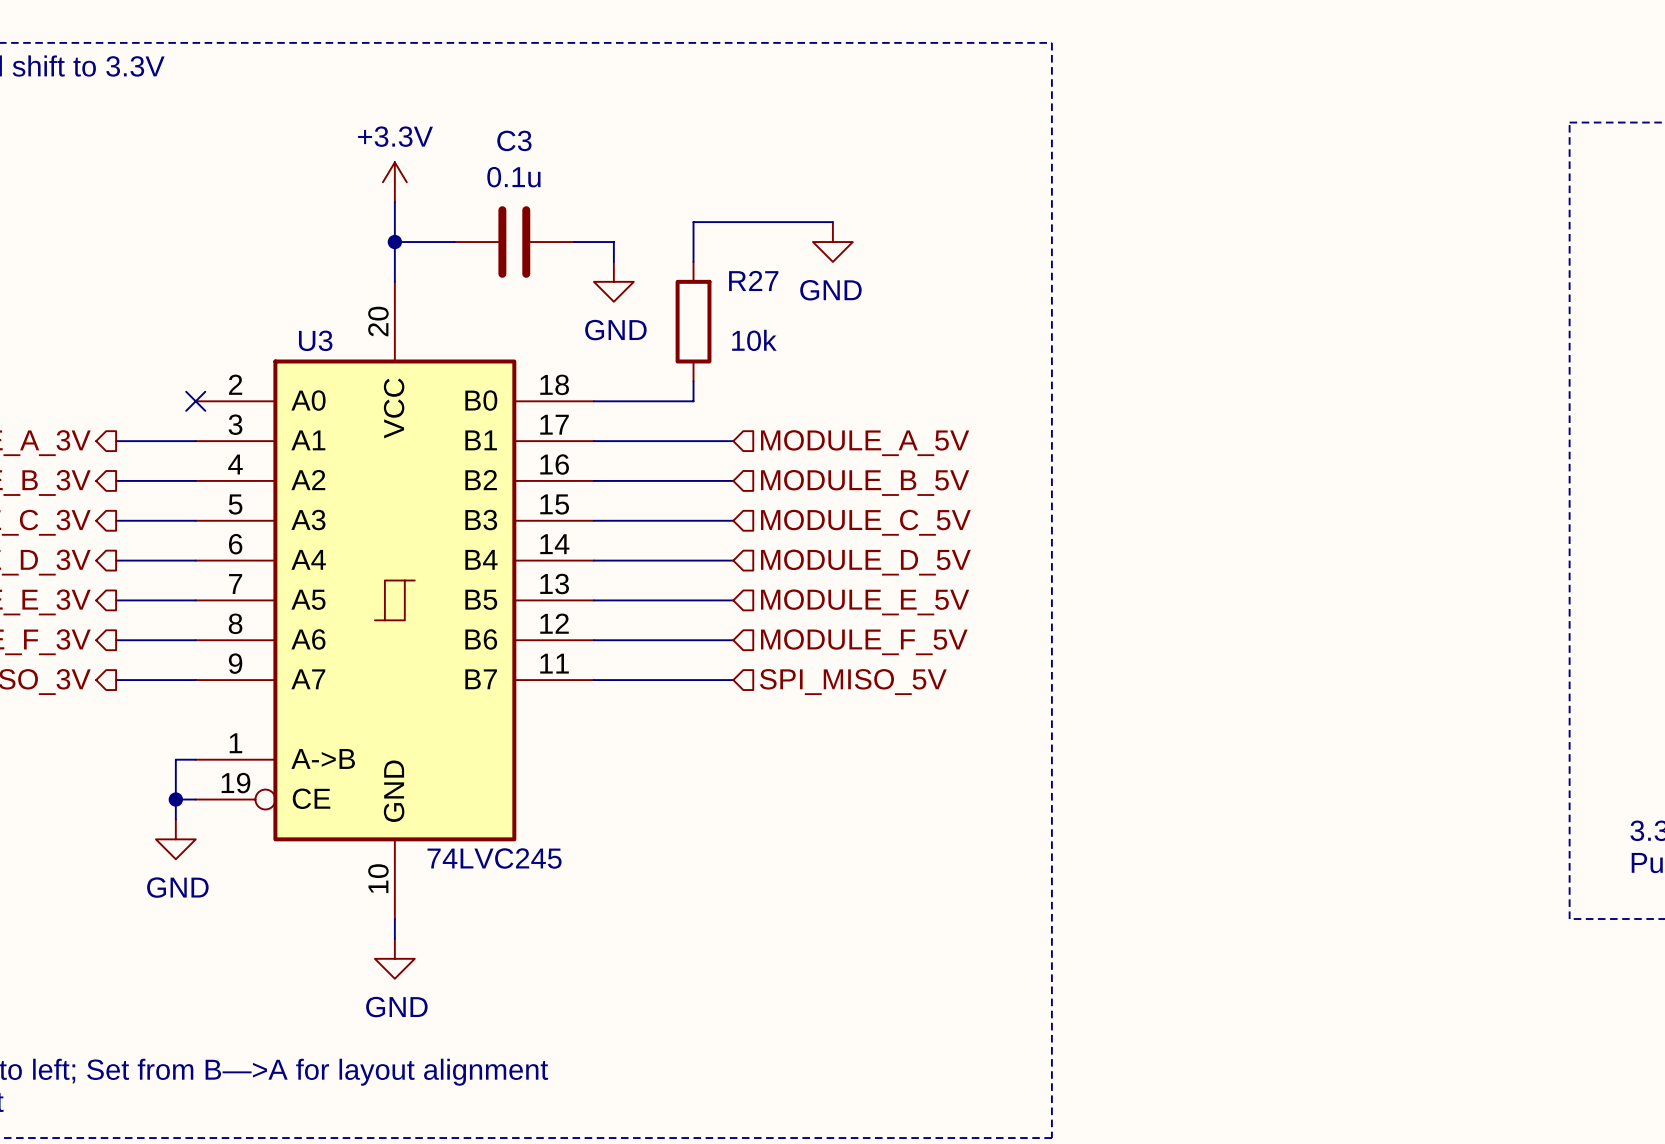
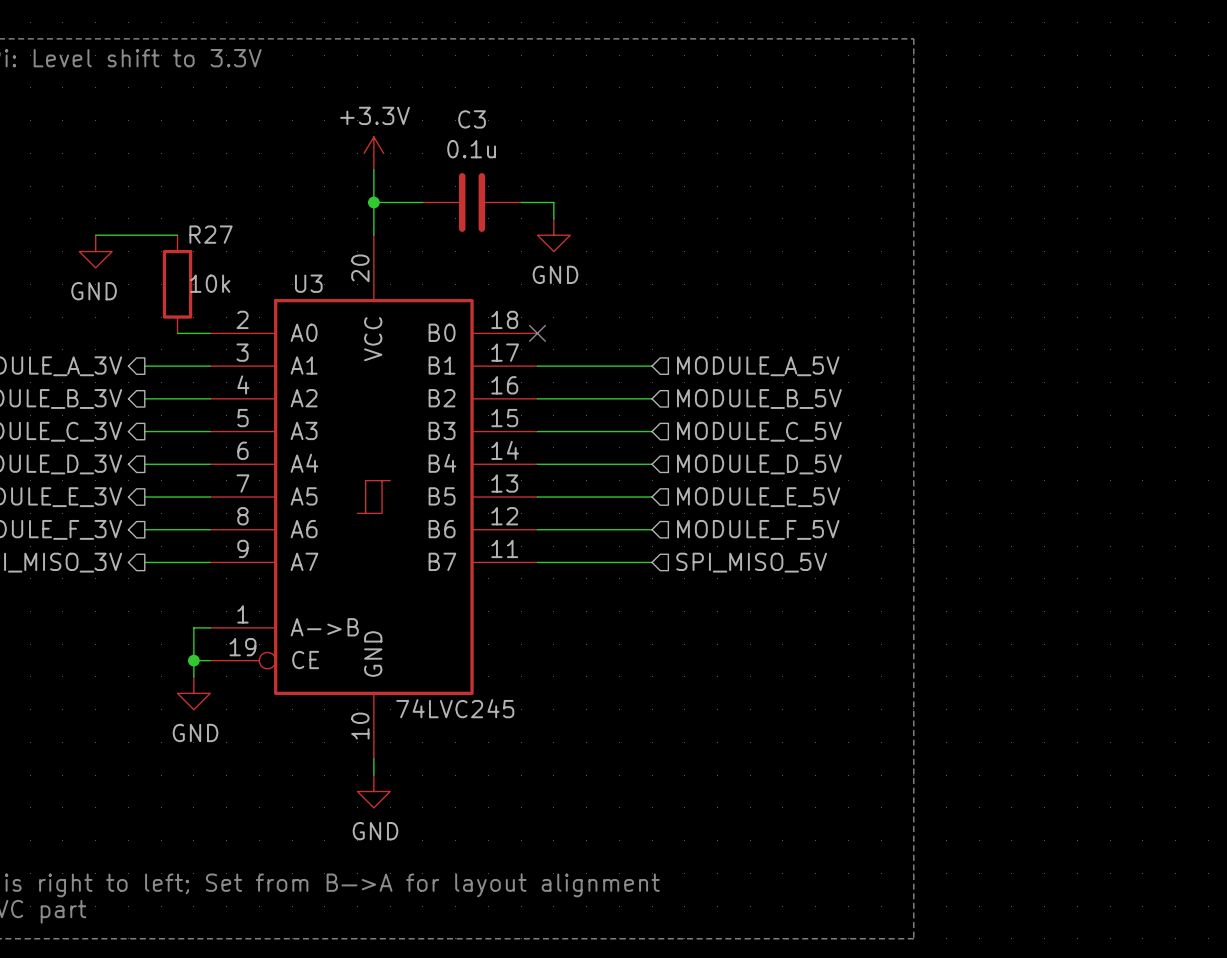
wire: (832, 222) (693, 222) (693, 261) -> none
power symbol: GND (832, 242) -> none
R27 name position: R27 (753, 280) -> R27 (211, 234)
wire: none -> (95, 235) (177, 235)
power symbol: none -> GND (95, 251)
R27 position: (693, 321) -> (177, 284)
R27 value position: 10k (754, 340) -> 10k (210, 283)
wire: (693, 381) (693, 401) (593, 401) -> none
wire: none -> (177, 333) (210, 333)
no-connect mark: (195, 401) -> none
no-connect mark: none -> (537, 333)

